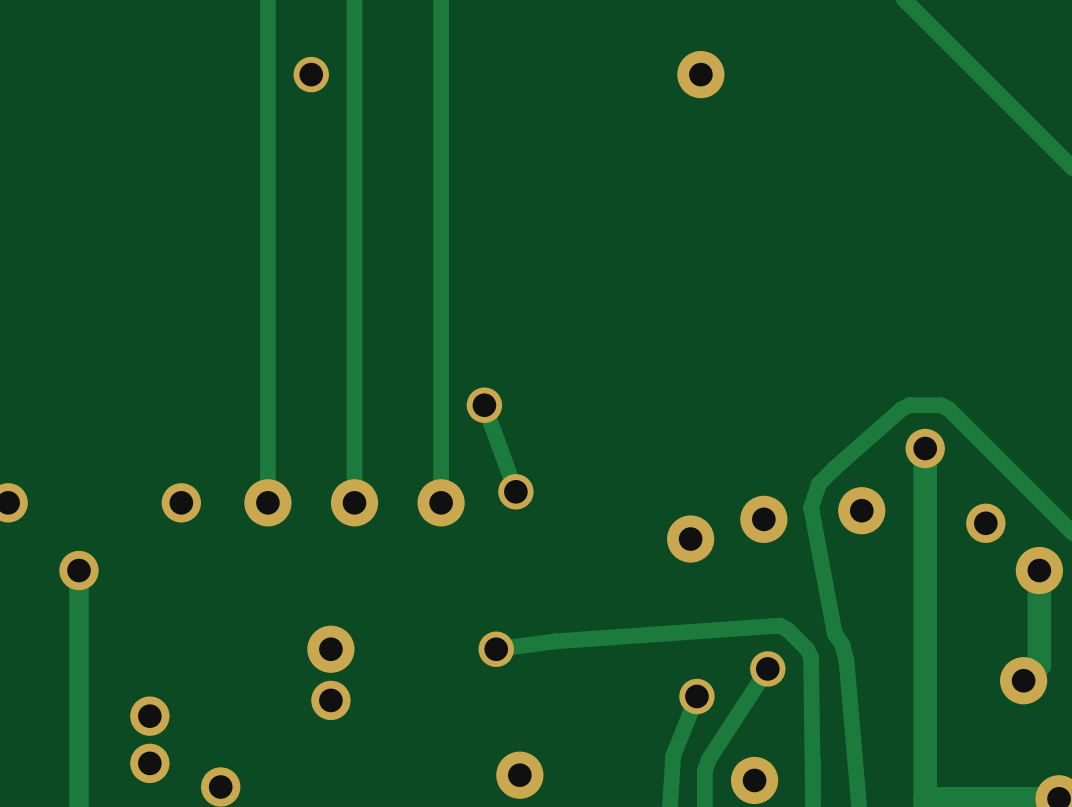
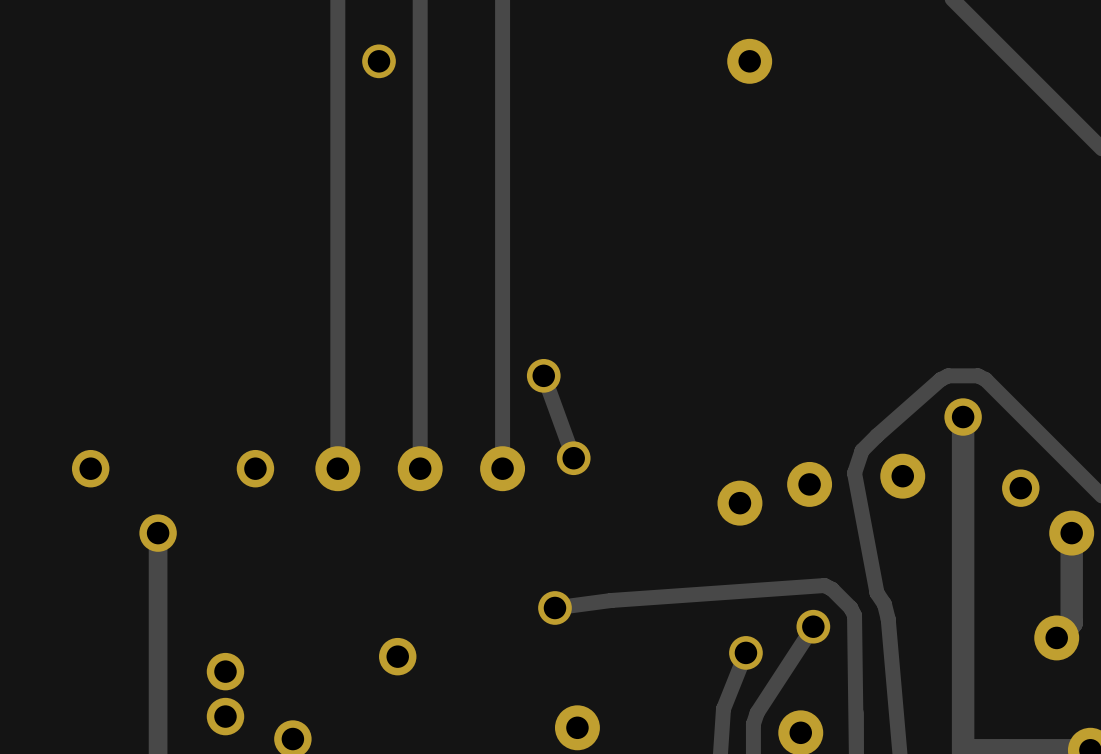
via: (330, 649) -> none

